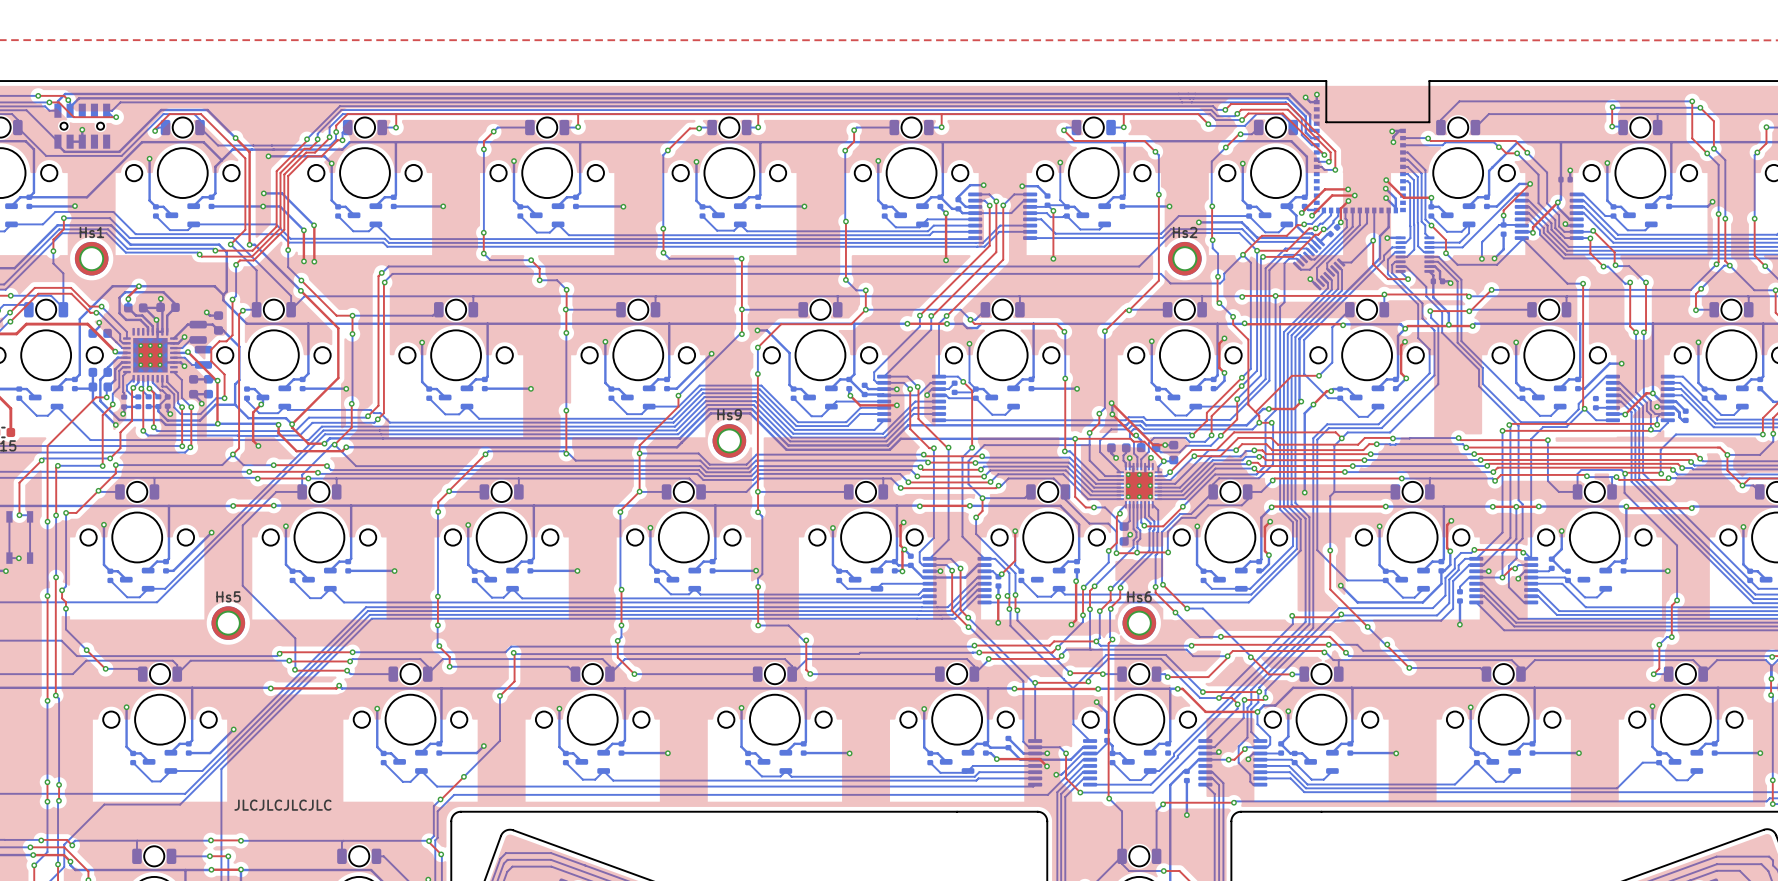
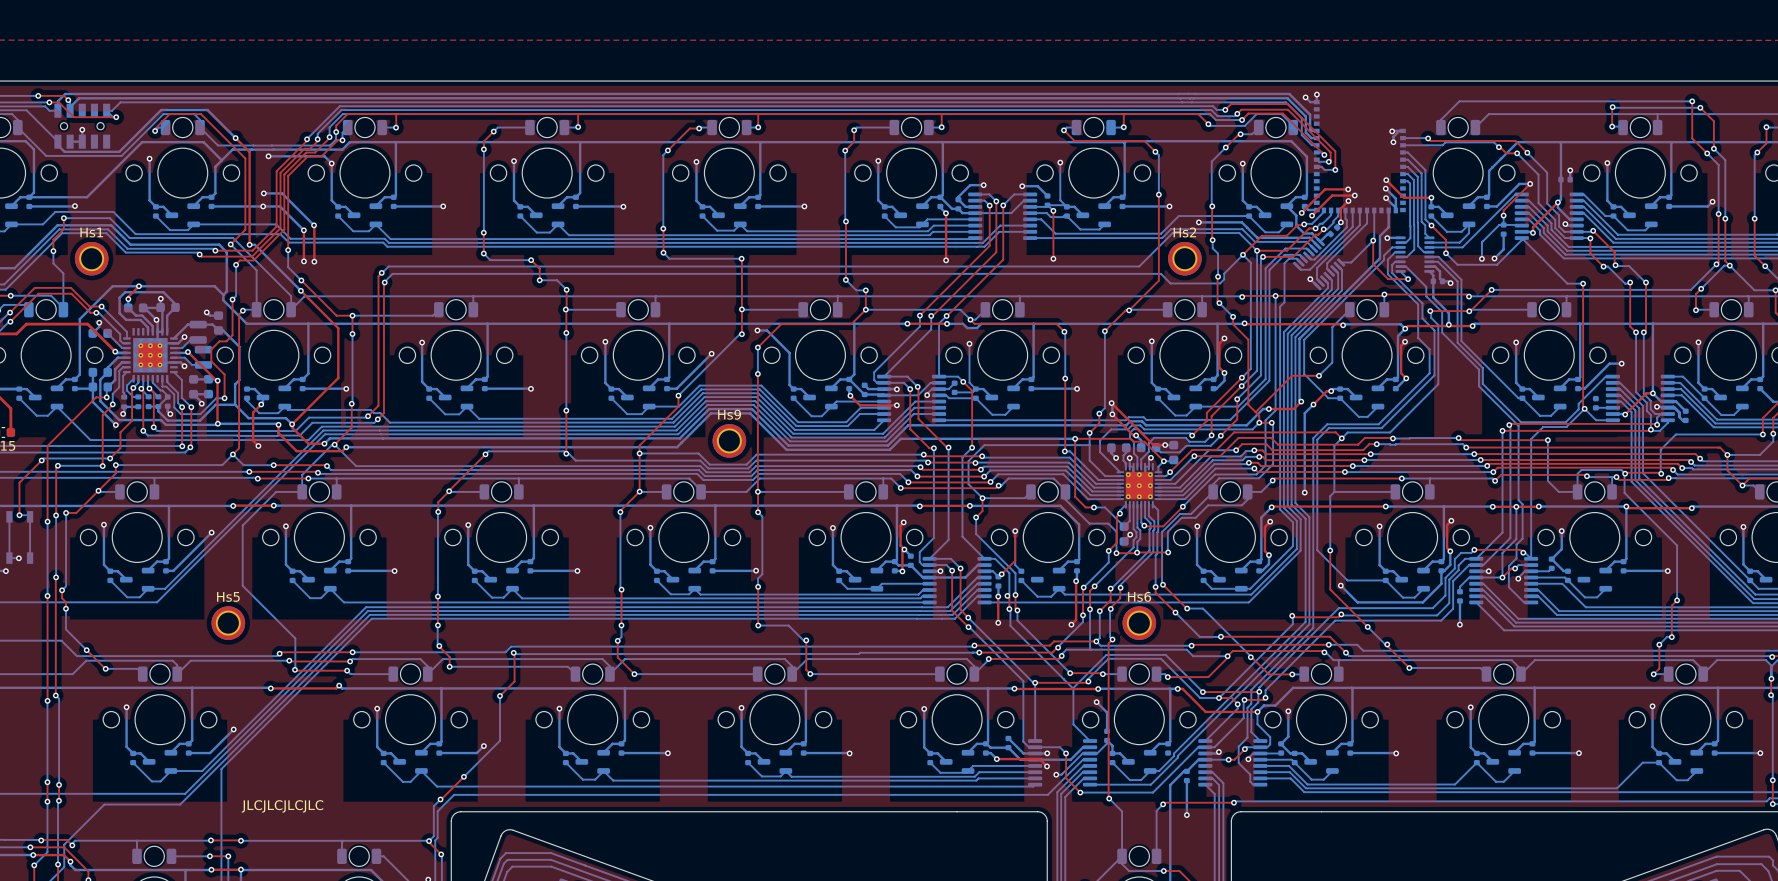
board edge: (1326, 81) (1326, 122) (1429, 122) (1429, 81) -> (1326, 81) (1429, 81)

